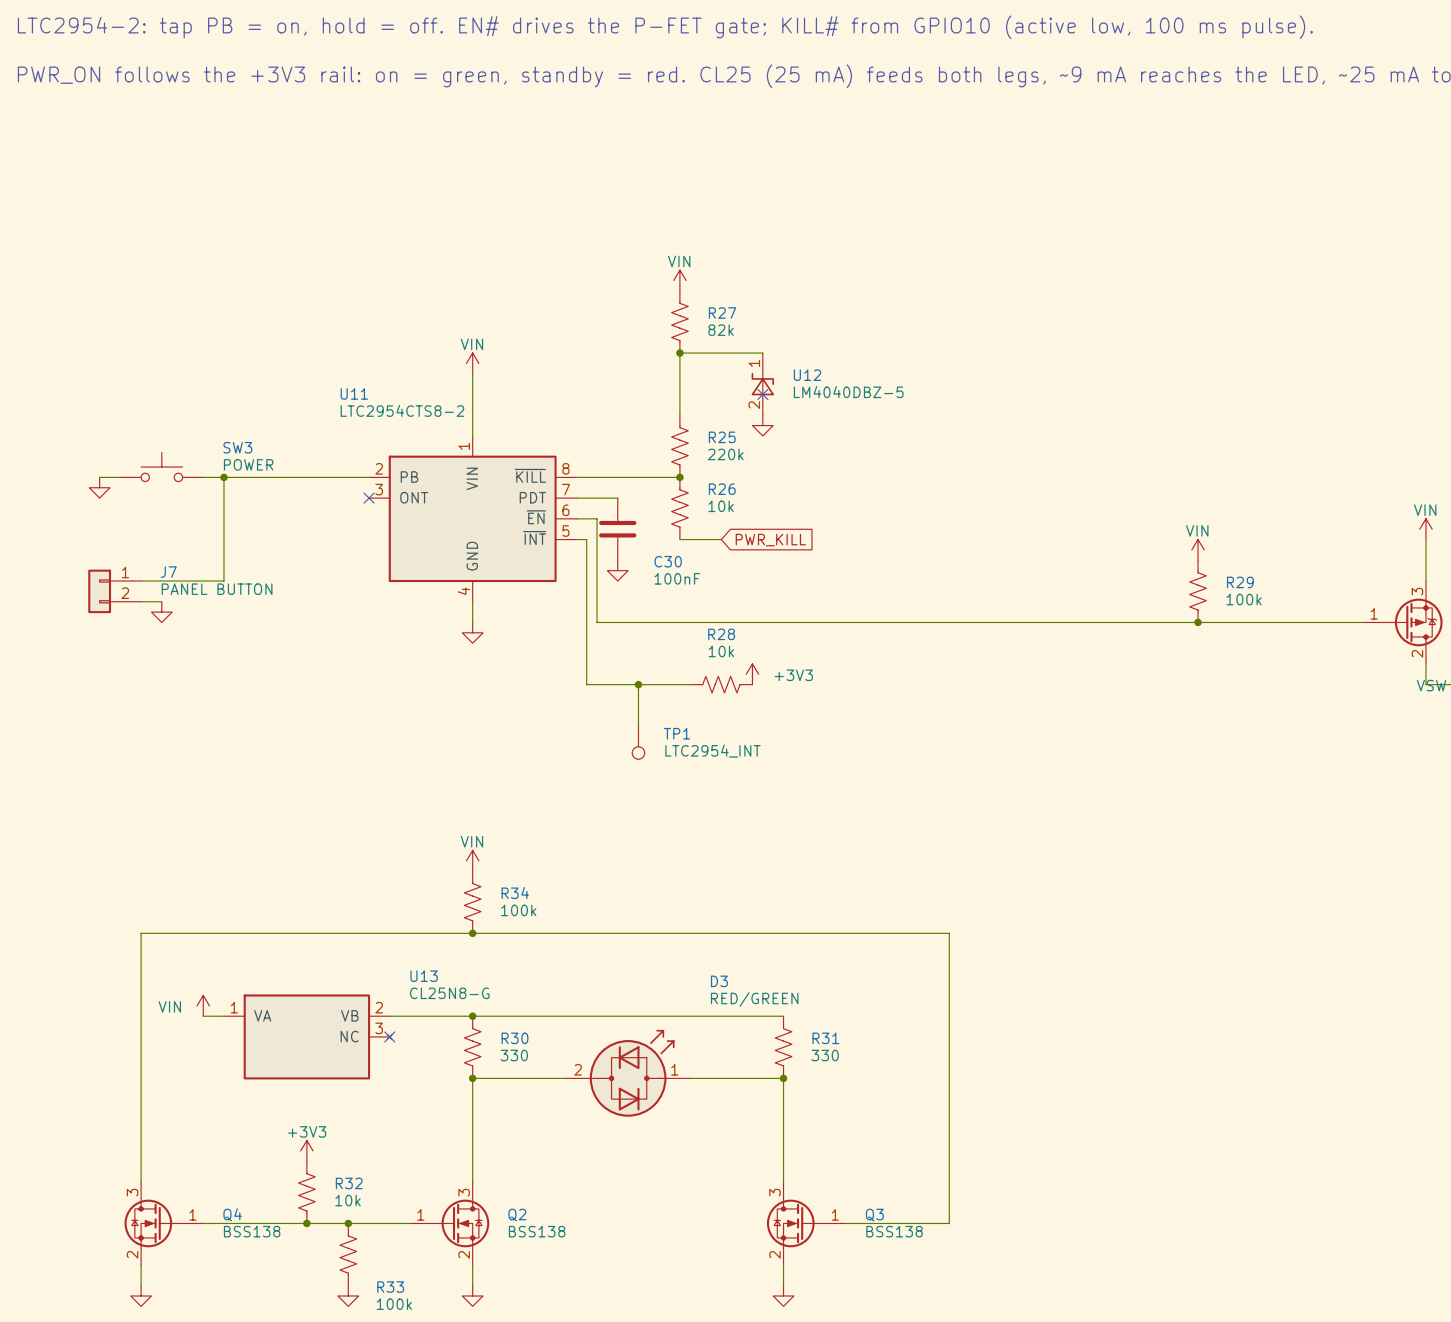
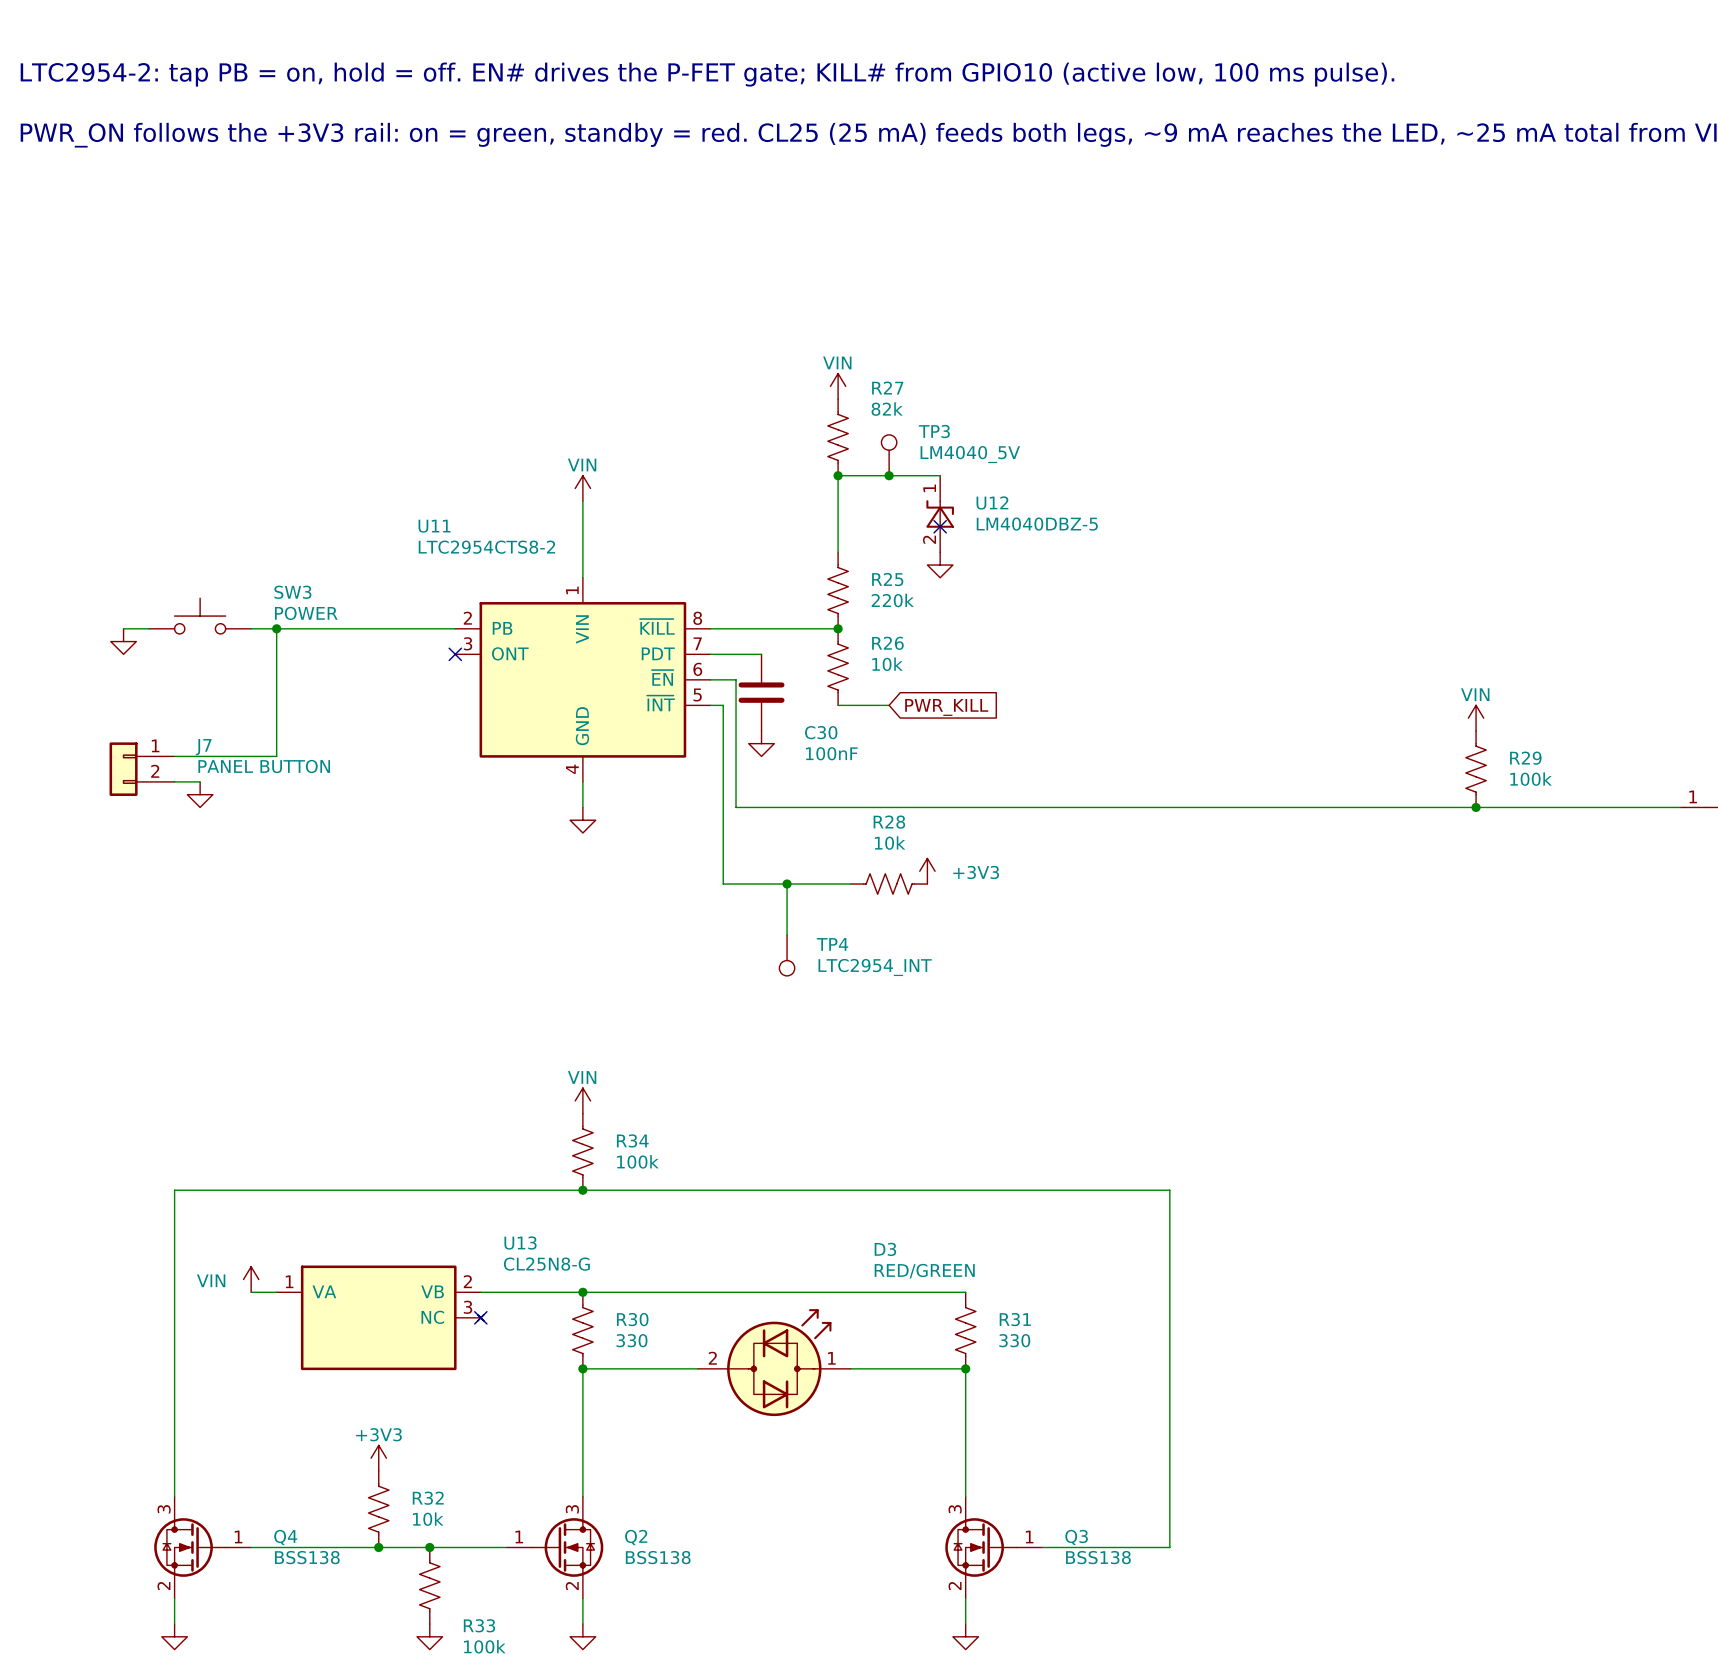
R27 name position: R27 (722, 313) -> R27 (887, 388)
R27 value position: 82k (721, 330) -> 82k (887, 409)
TP3: none -> LM4040_5V (889, 455)
junction: none -> (889, 475)
TP1 name: TP1 (677, 733) -> TP4 (832, 944)

